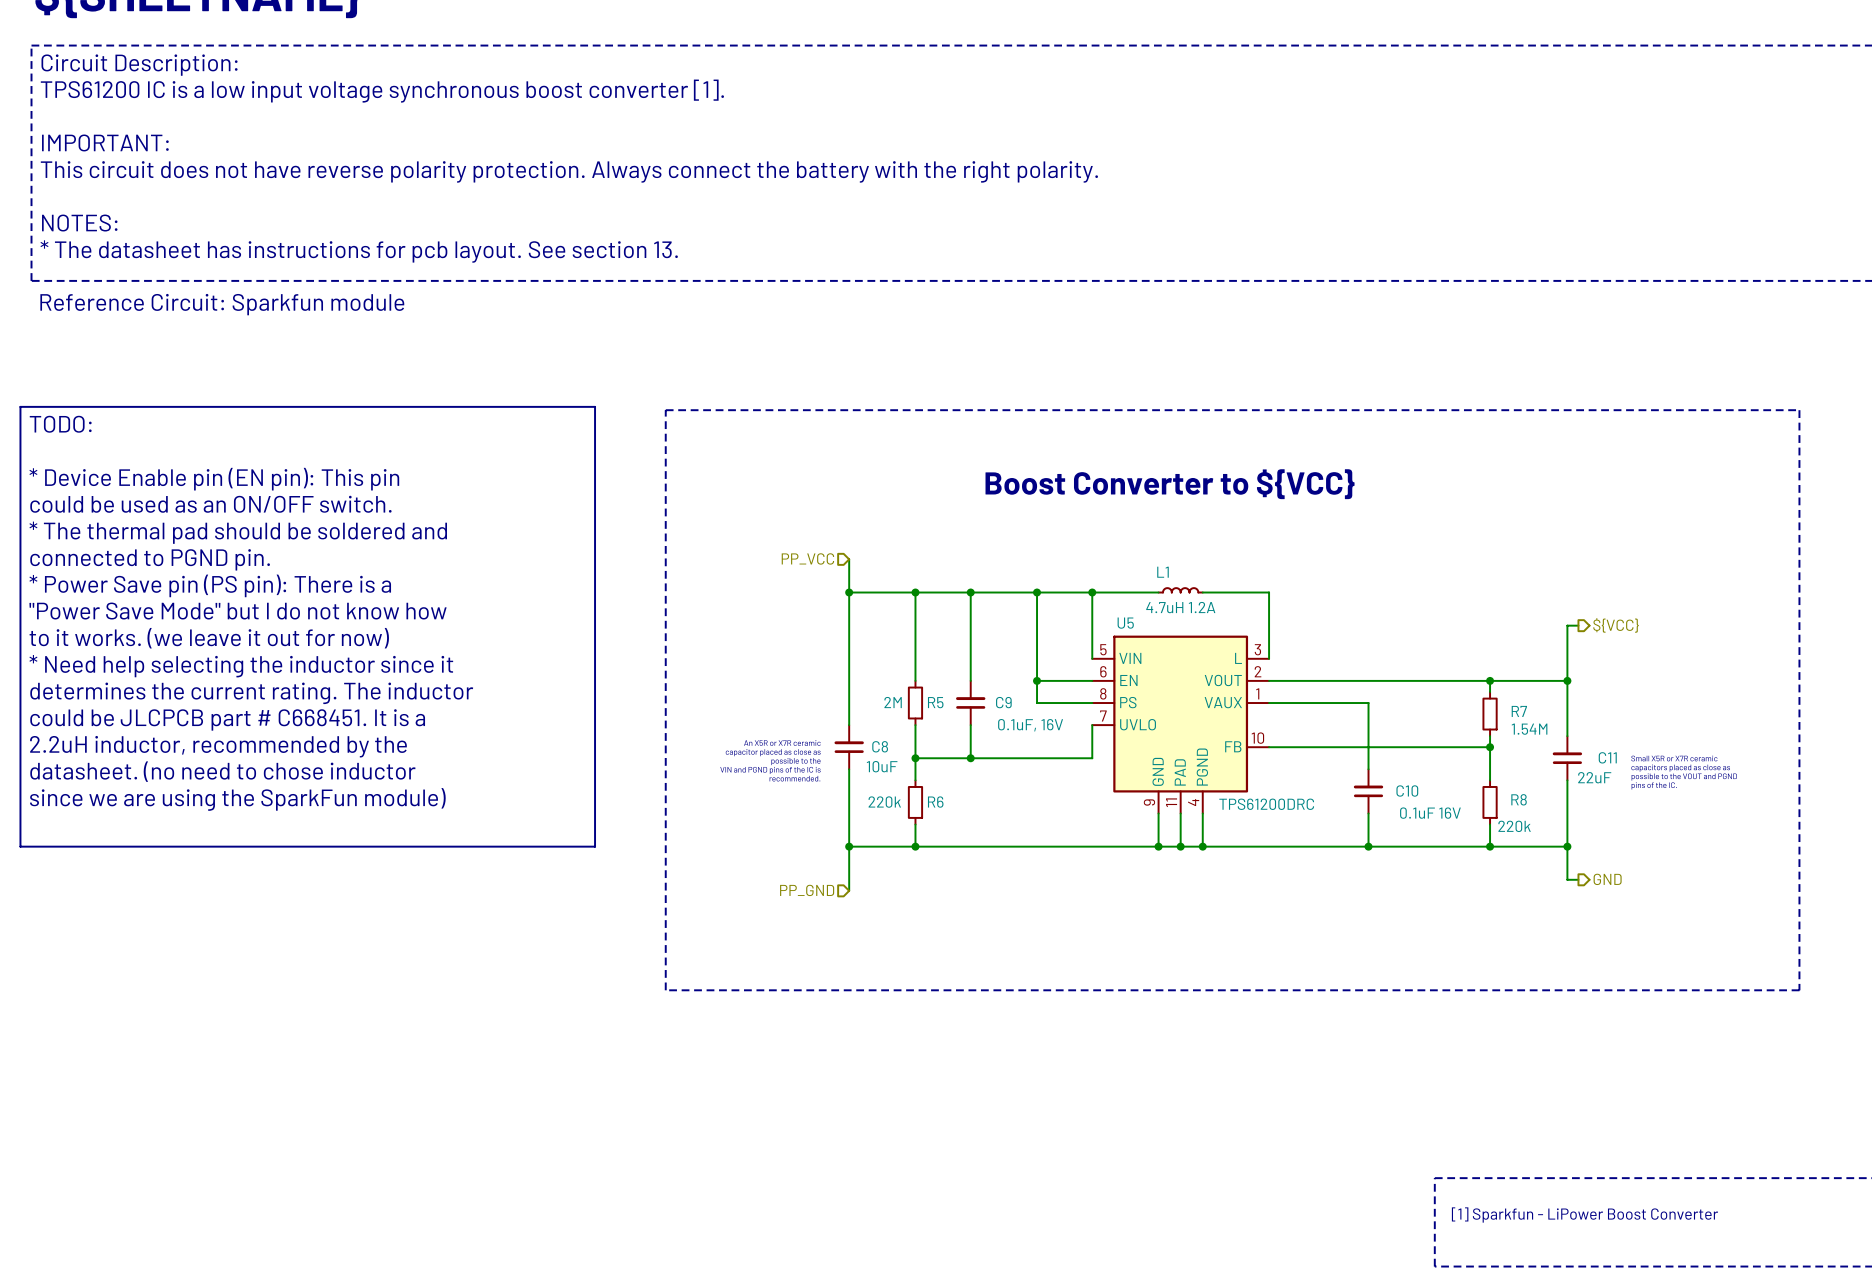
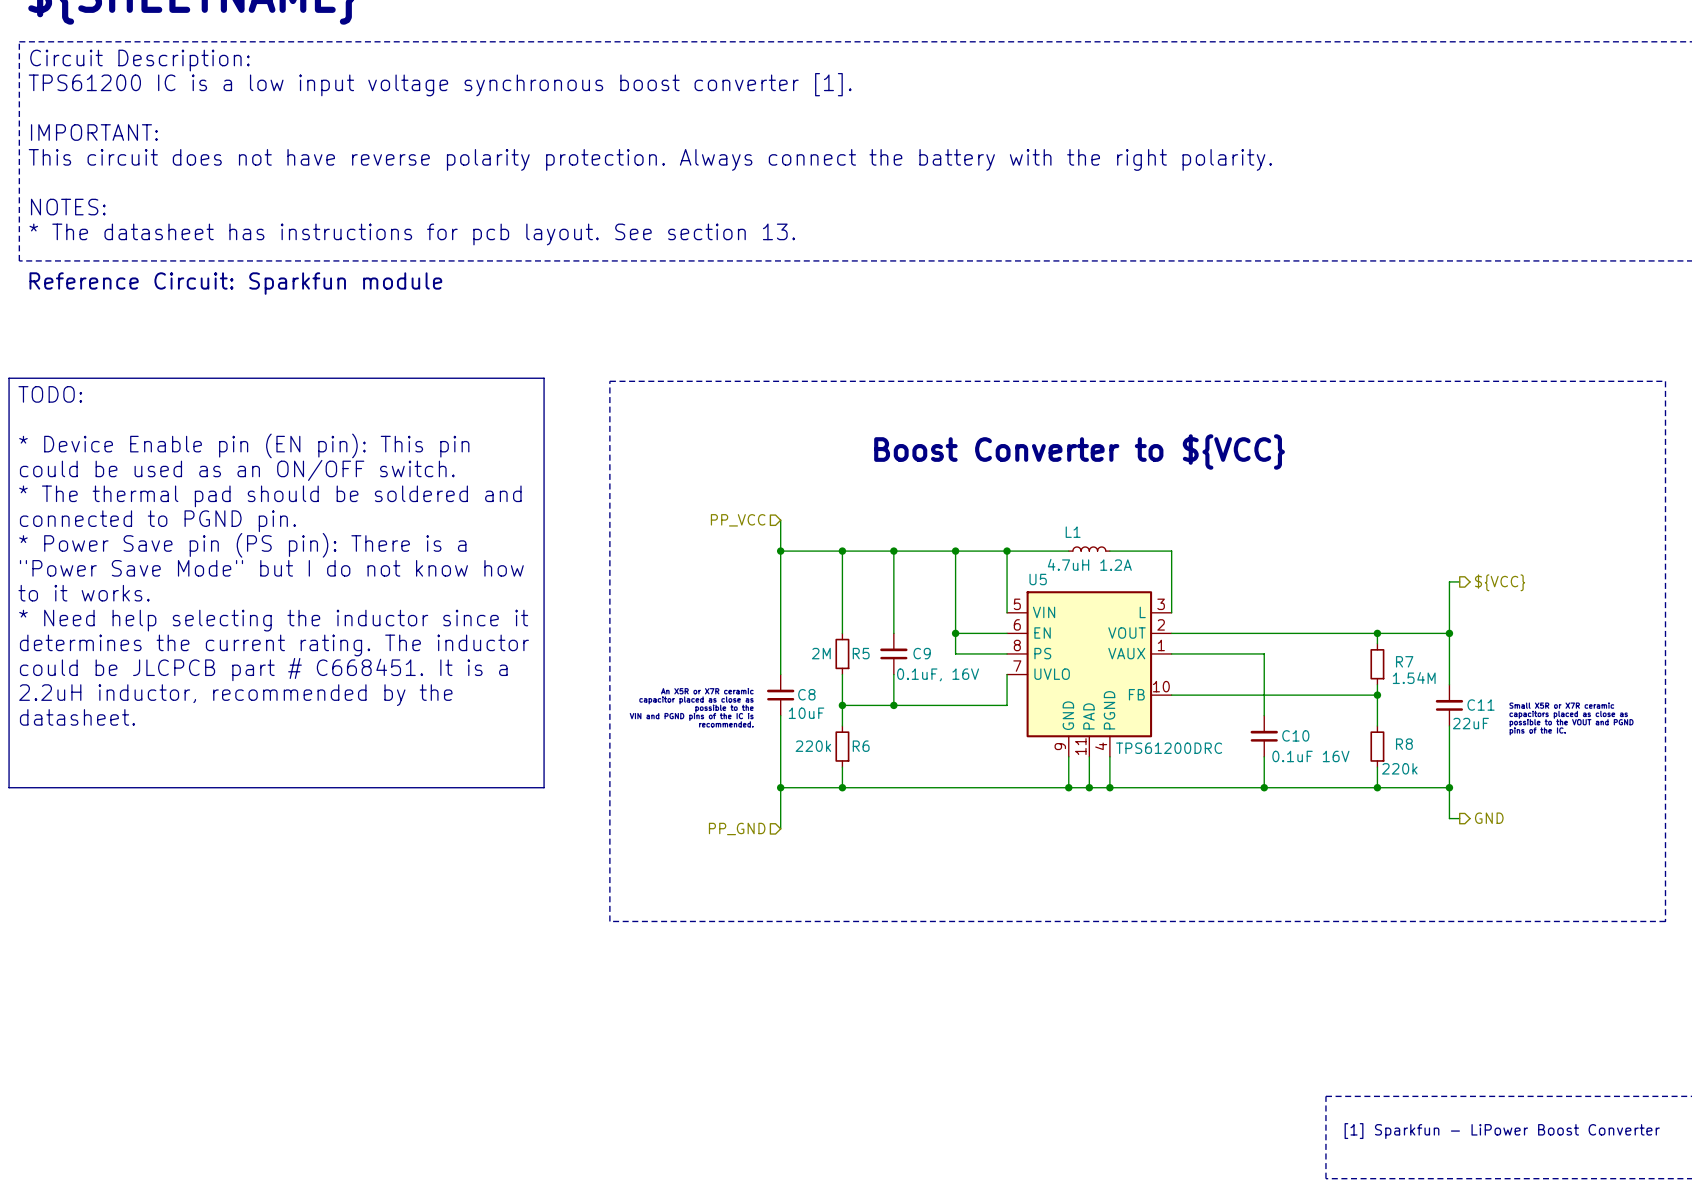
text: to it works. (we leave it out for now) (209, 638) -> to it works. (84, 593)
text: datasheet. (no need to chose inductor (222, 771) -> datasheet. (77, 717)
text: since we are using the SparkFun module) (237, 799) -> none

